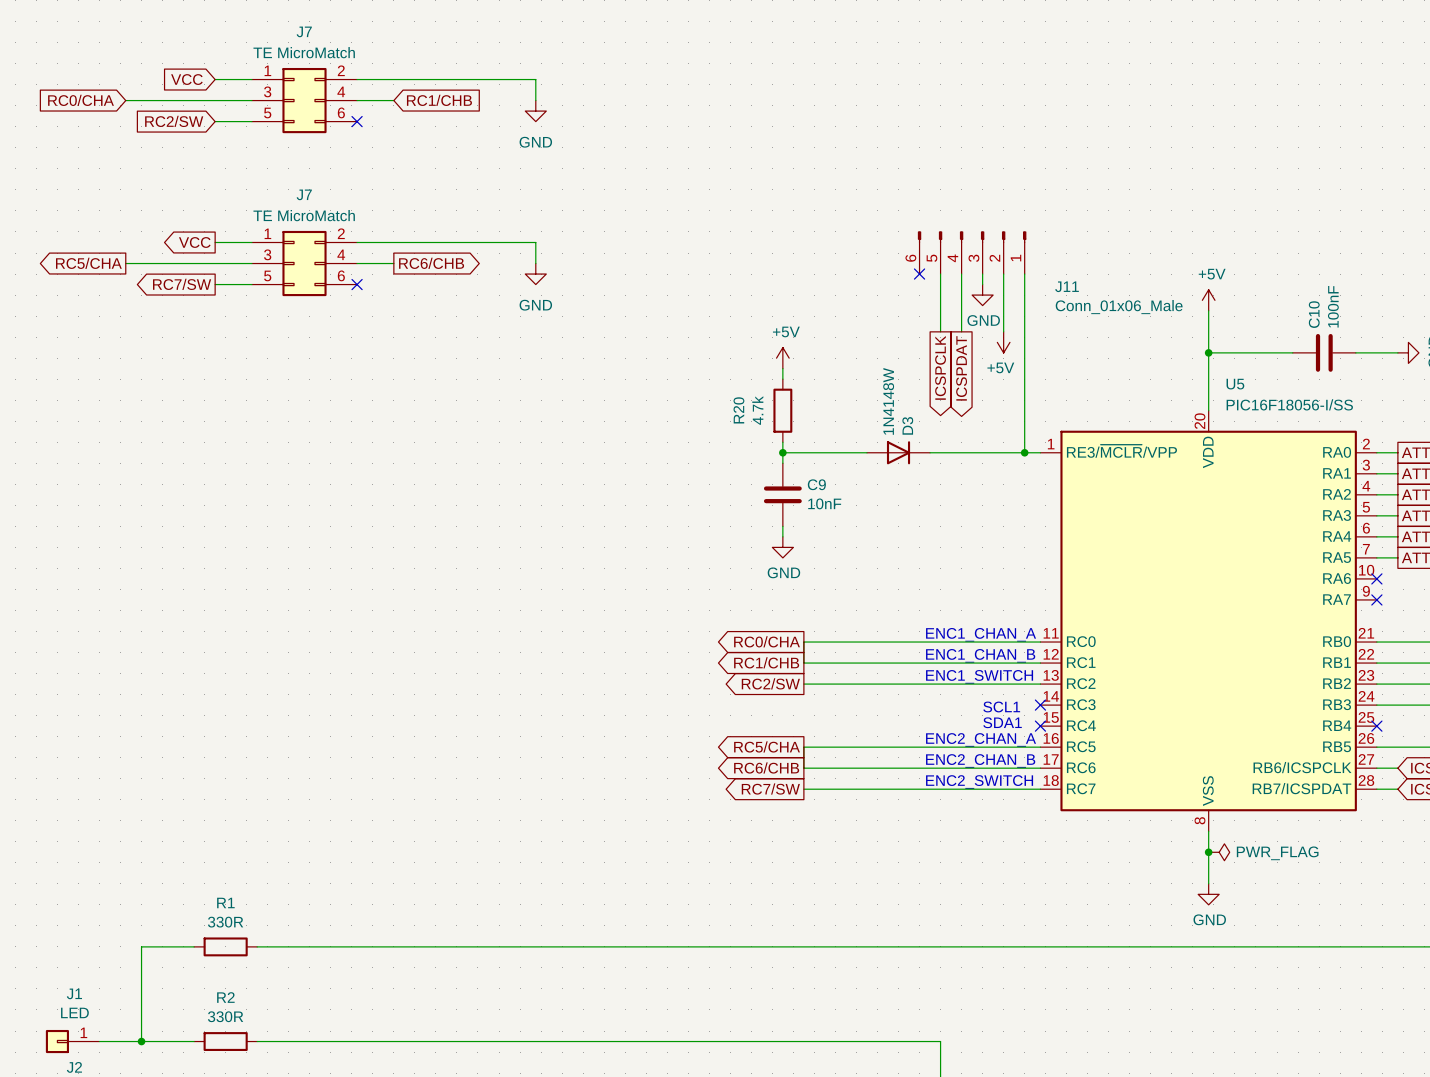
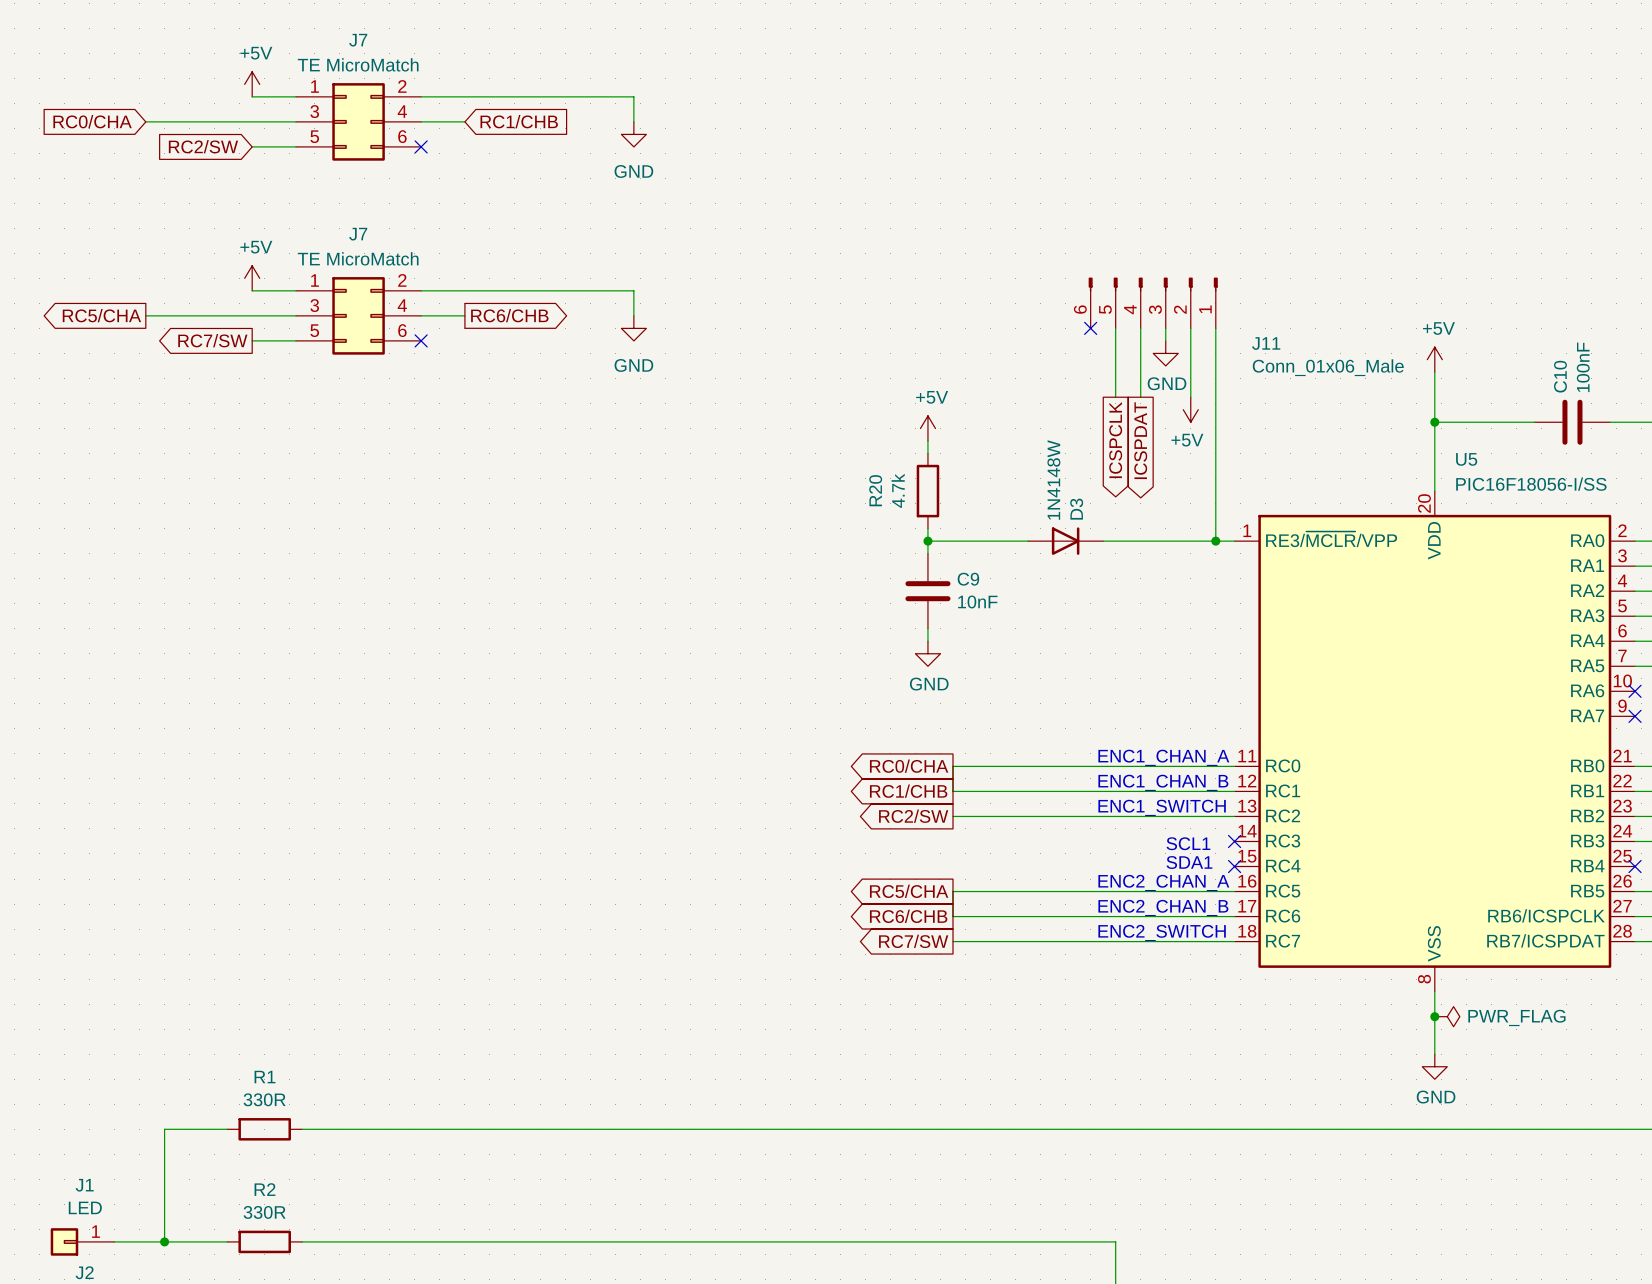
power symbol: none -> +5V (252, 84)
global label: VCC (186, 79) -> none
power symbol: none -> +5V (252, 278)
global label: VCC (194, 242) -> none

